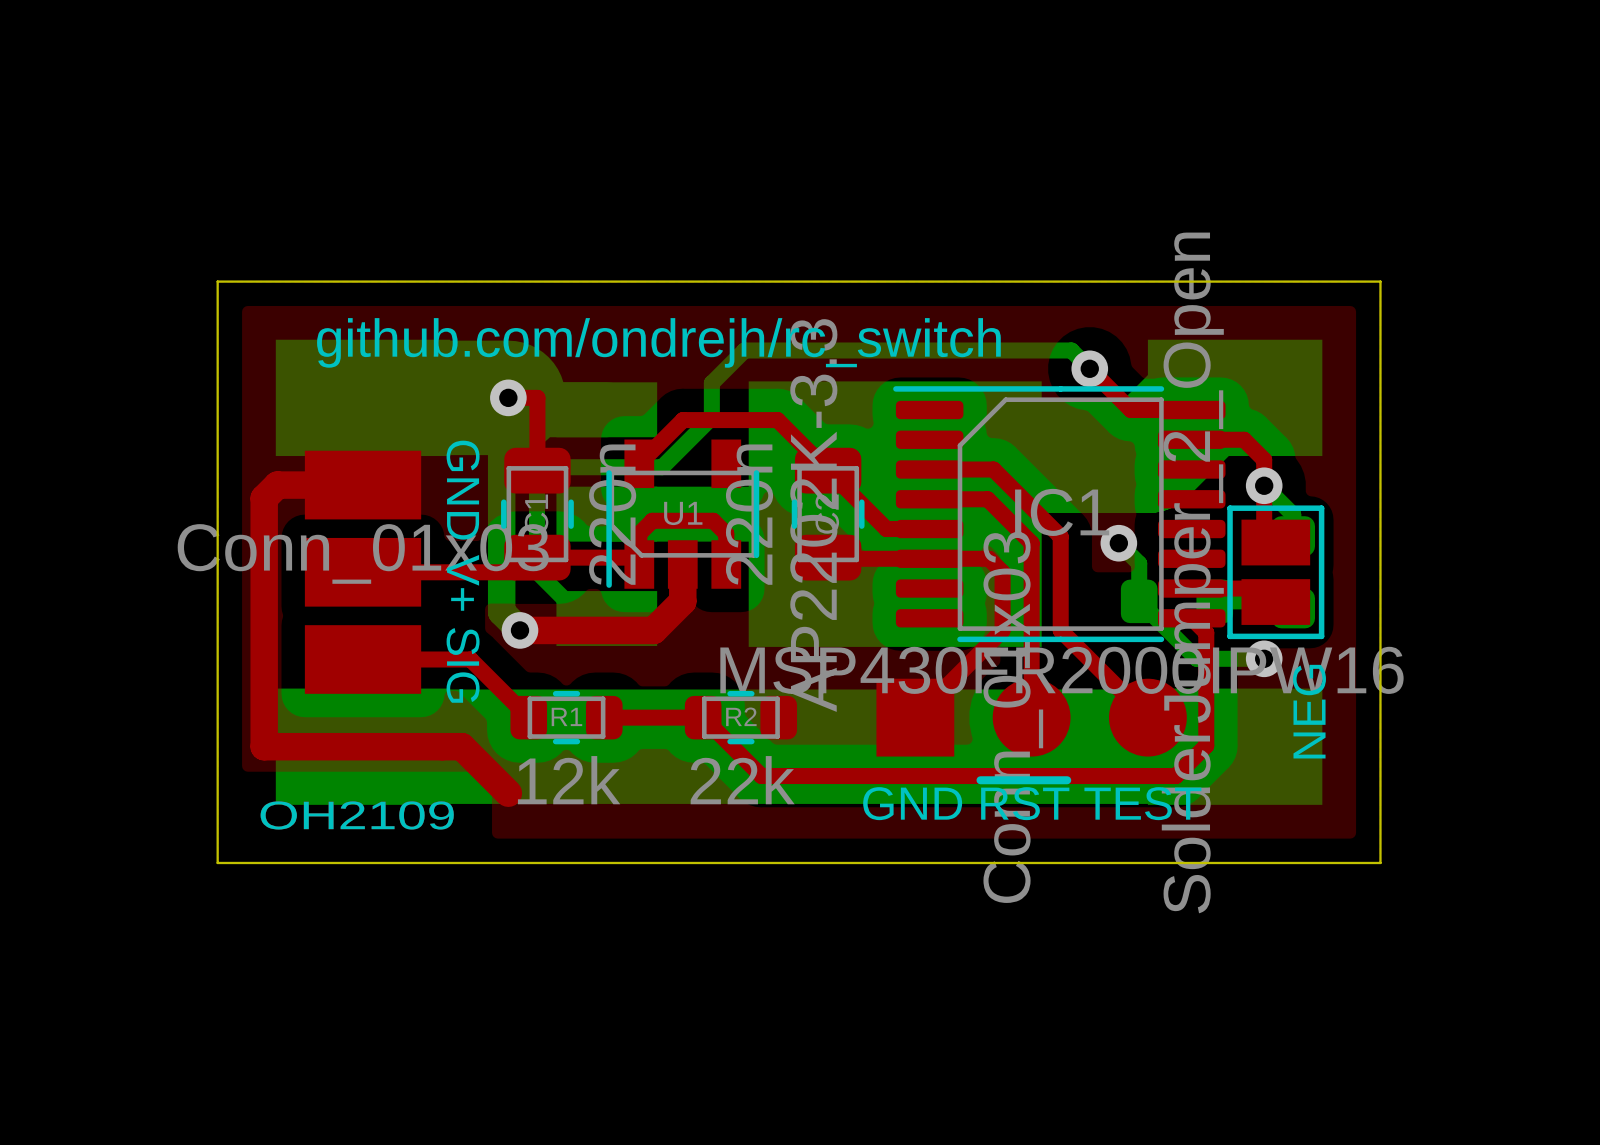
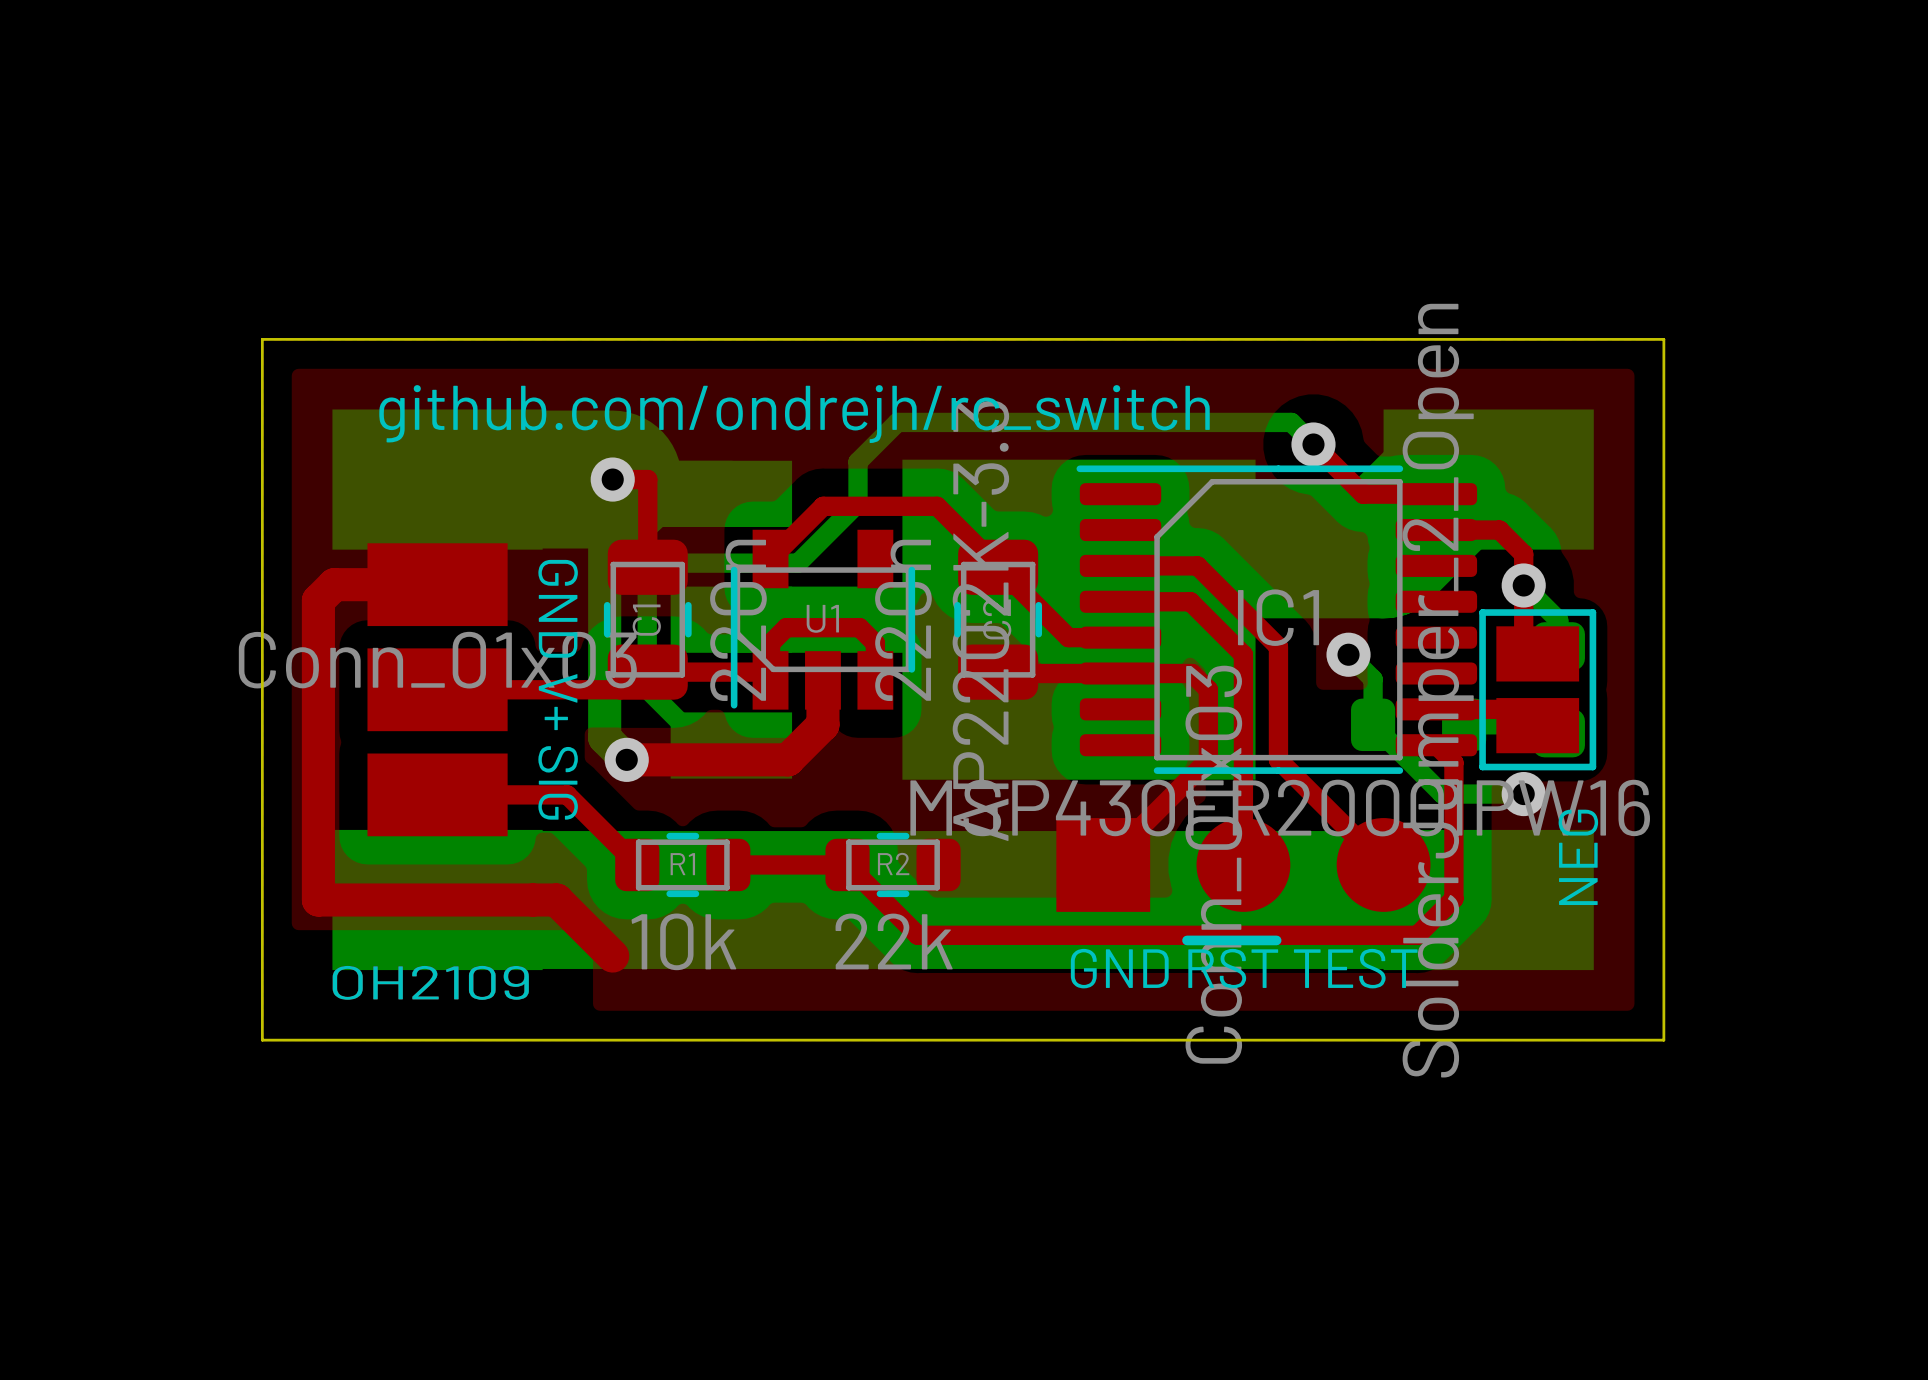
R1 value: 12k (569, 780) -> 10k (683, 941)

